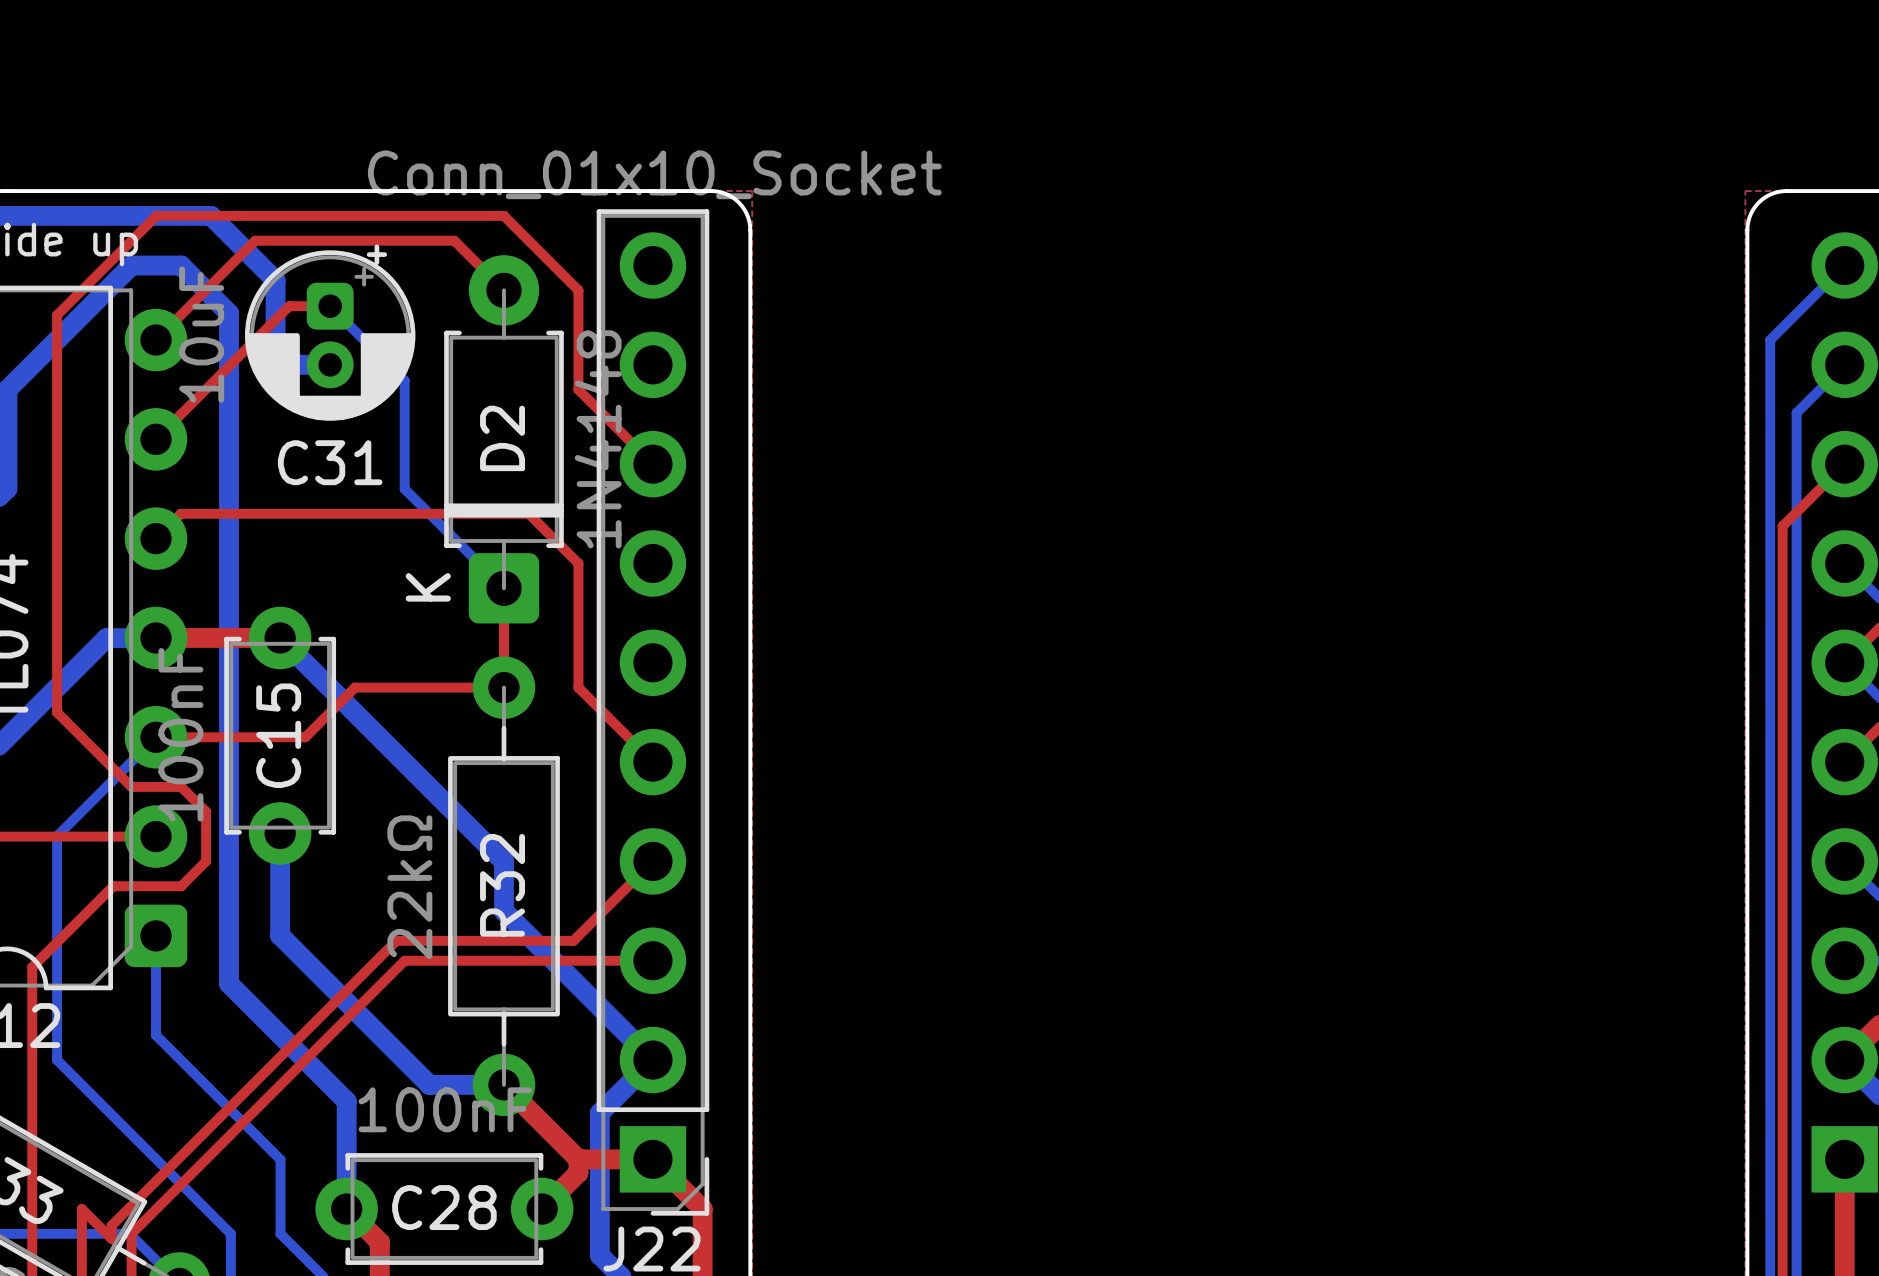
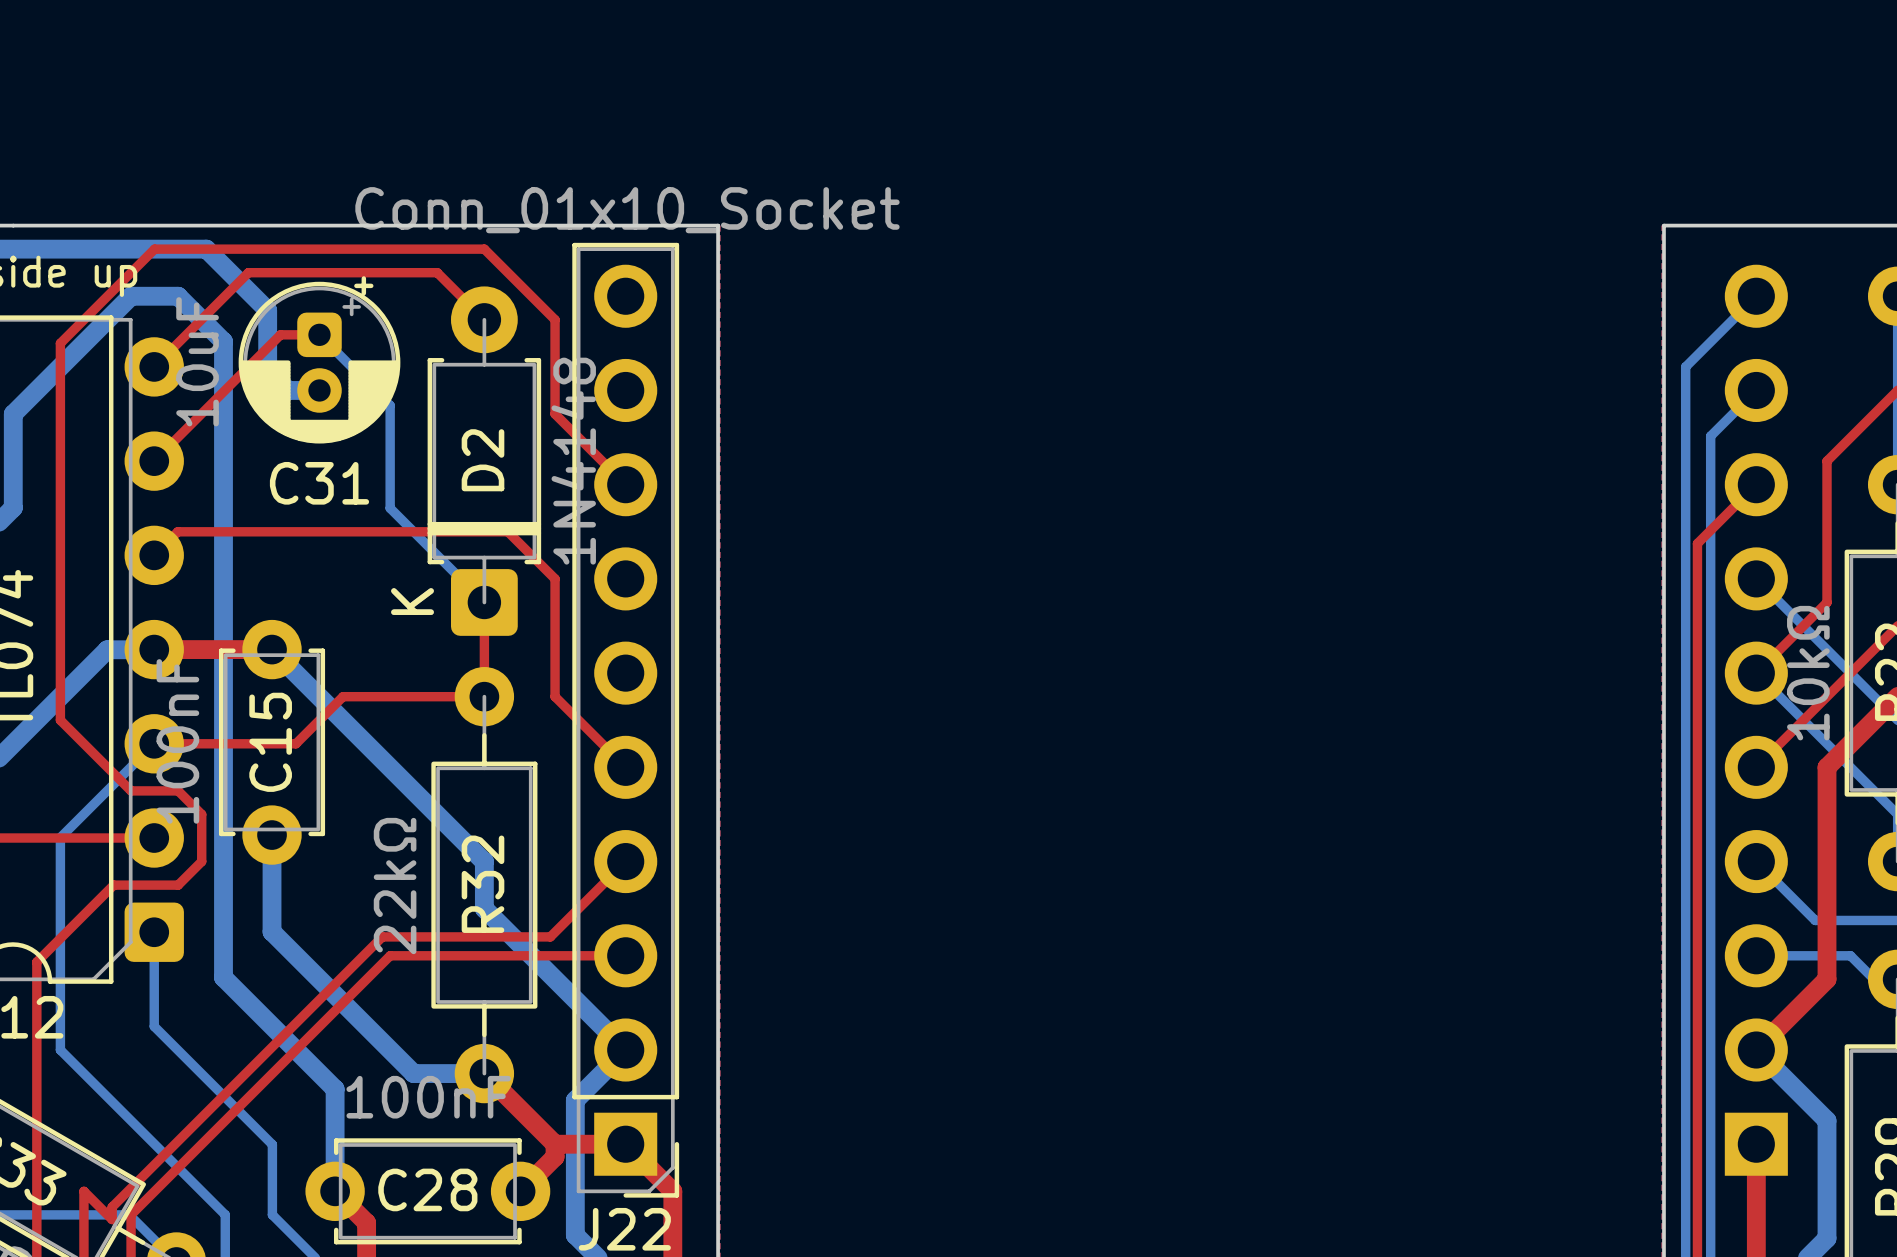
board edge: (711, 191) (724, 193) (738, 202) (748, 217) (750, 230) -> (680, 225) (718, 225) (718, 262)
board edge: (1786, 191) (1773, 193) (1758, 202) (1751, 213) (1747, 230) -> (1701, 225) (1663, 225) (1663, 262)

